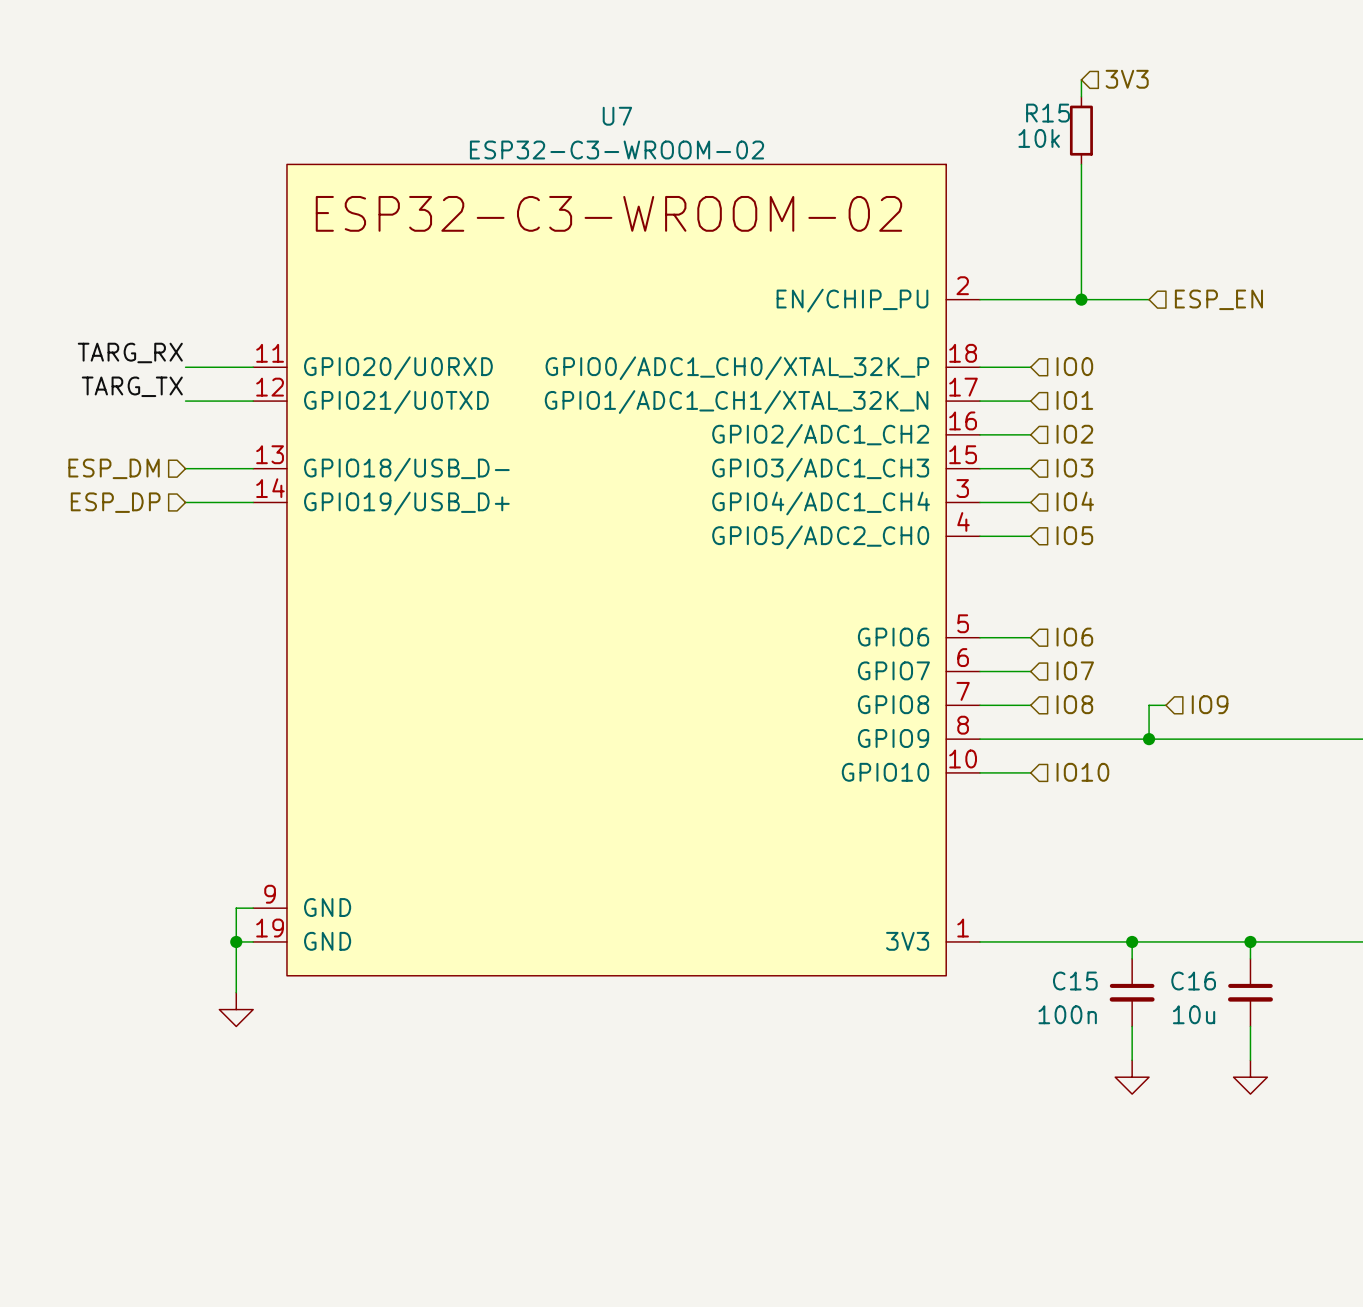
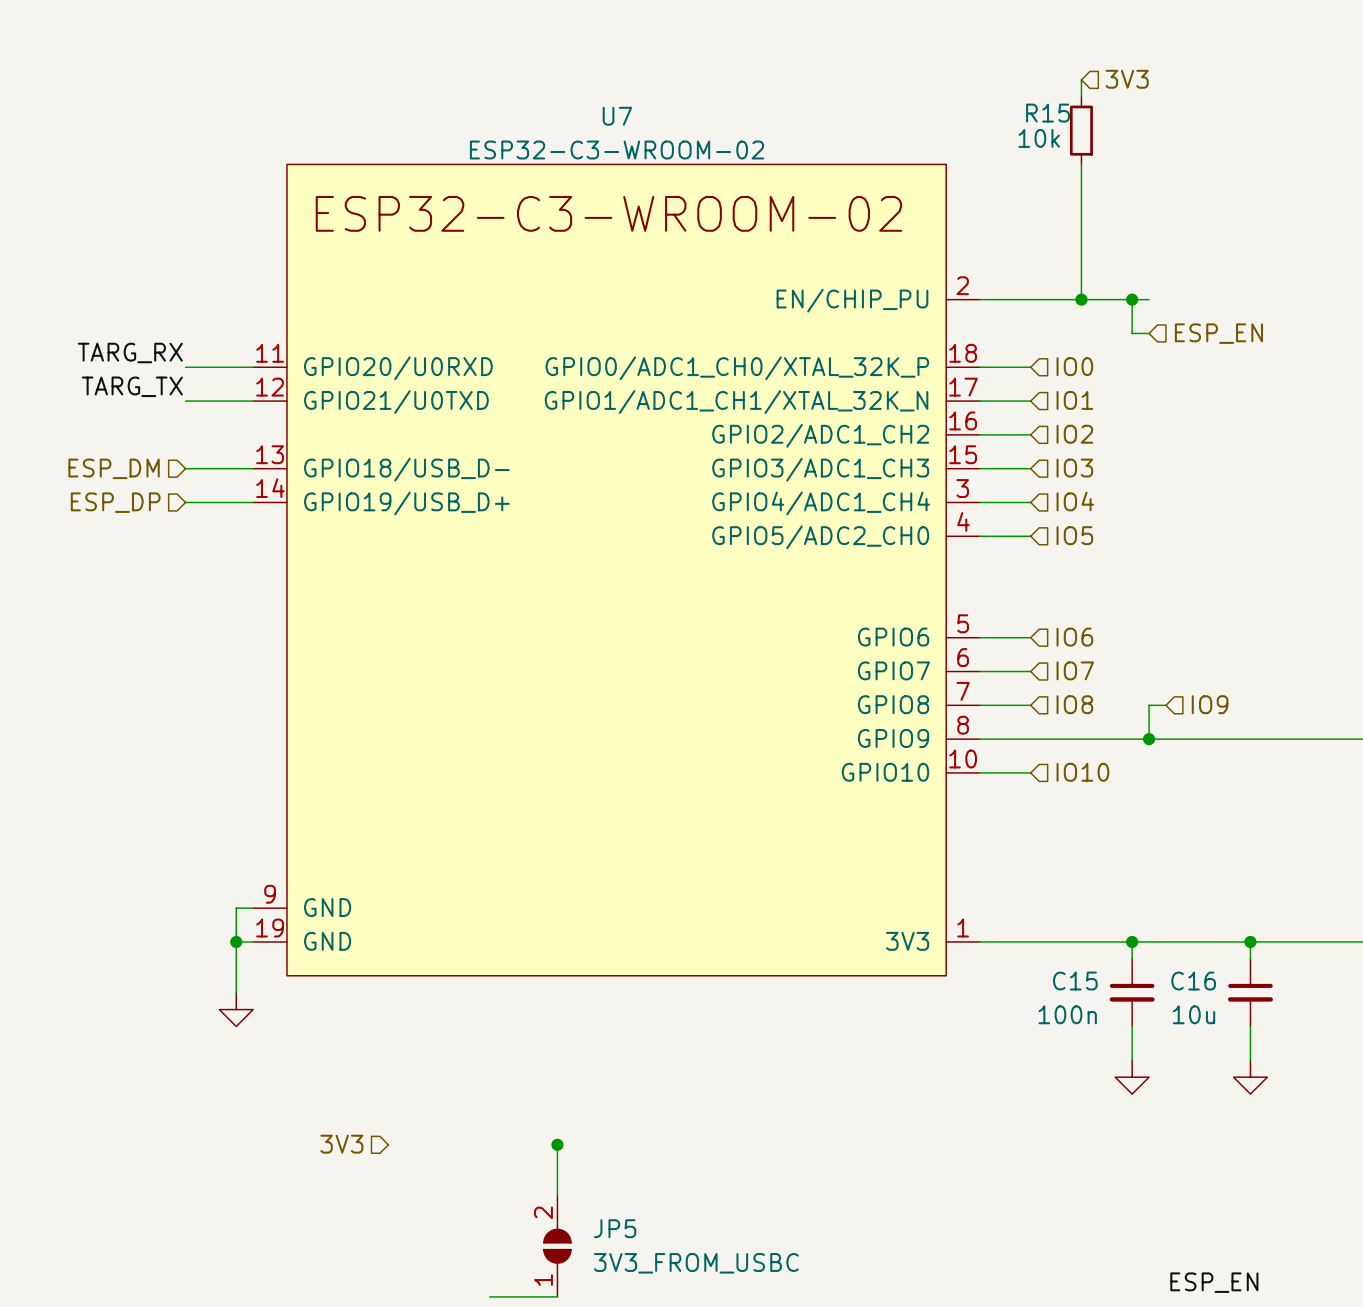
wire: none -> (1132, 299) (1132, 333) (1149, 333)
junction: none -> (1132, 299)
hierarchical label position: ESP_EN (1218, 299) -> ESP_EN (1218, 333)
hierarchical label: none -> 3V3 (341, 1144)
wire: none -> (557, 1144) (557, 1195)
junction: none -> (557, 1144)
JP5: none -> 3V3_FROM_USBC (557, 1246)
label: none -> ESP_EN (1214, 1282)
wire: none -> (489, 1296) (557, 1296)

